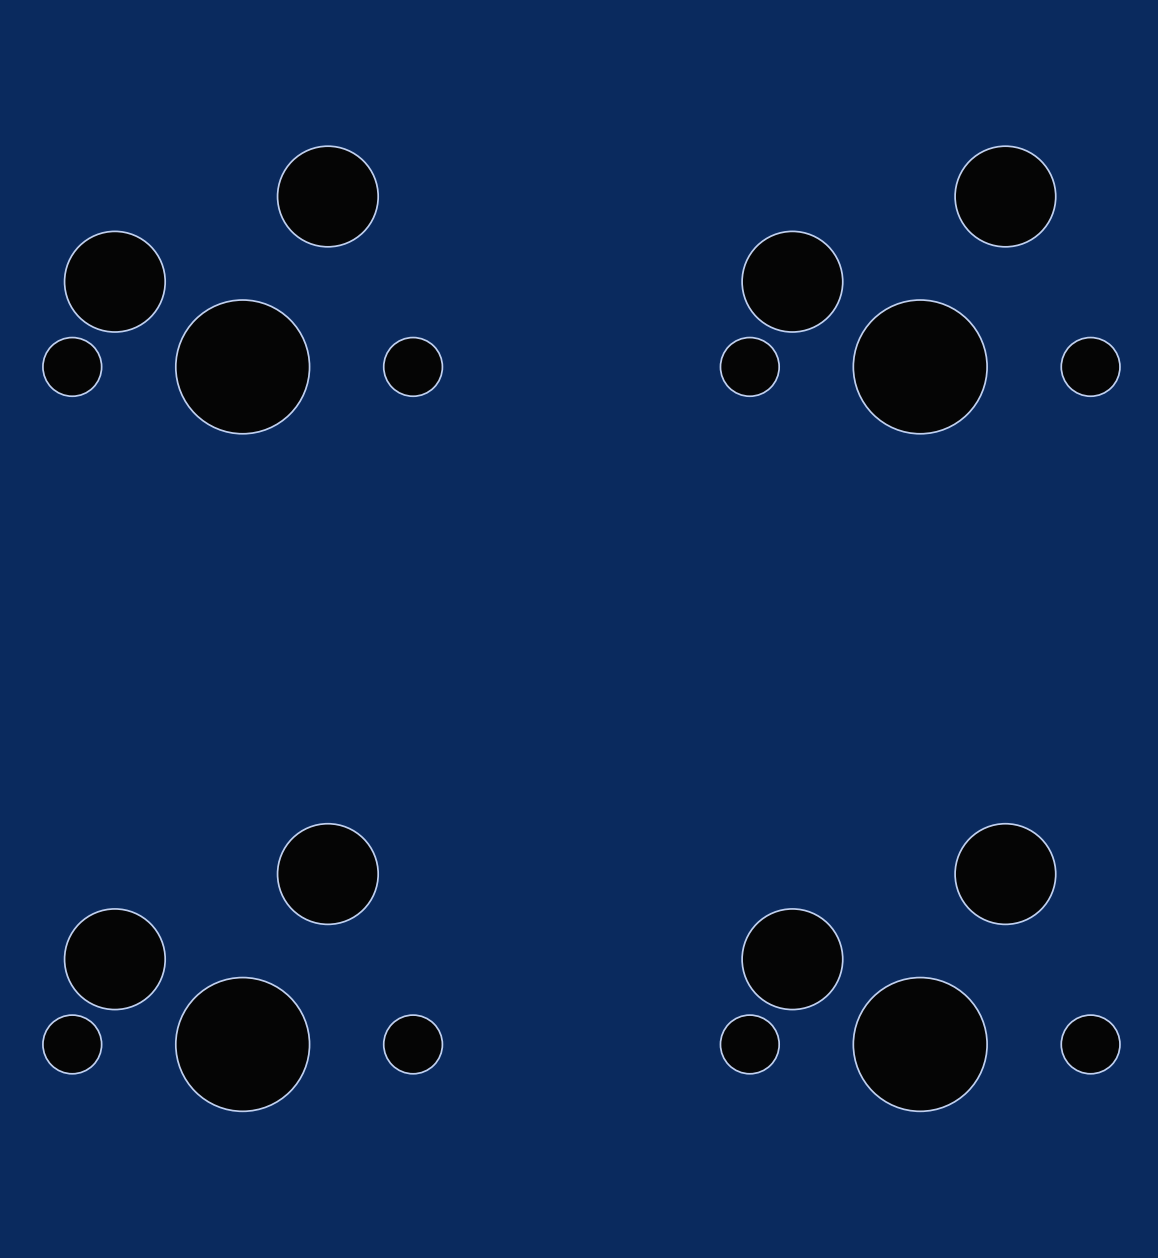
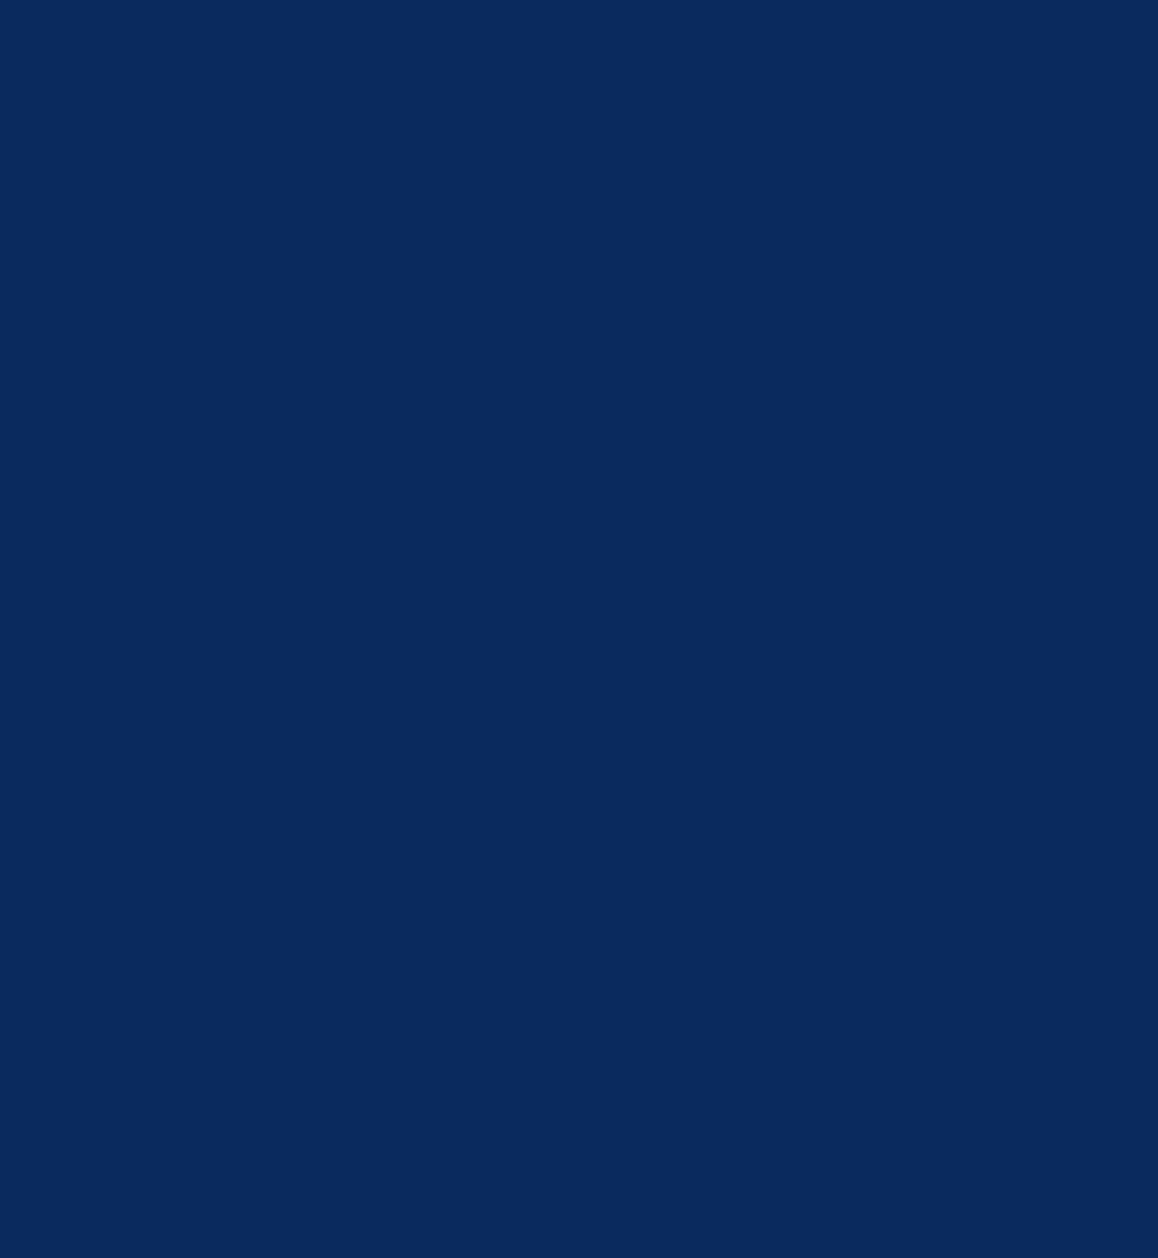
part: (242, 289) -> none
part: (920, 289) -> none
part: (242, 967) -> none
part: (920, 967) -> none

